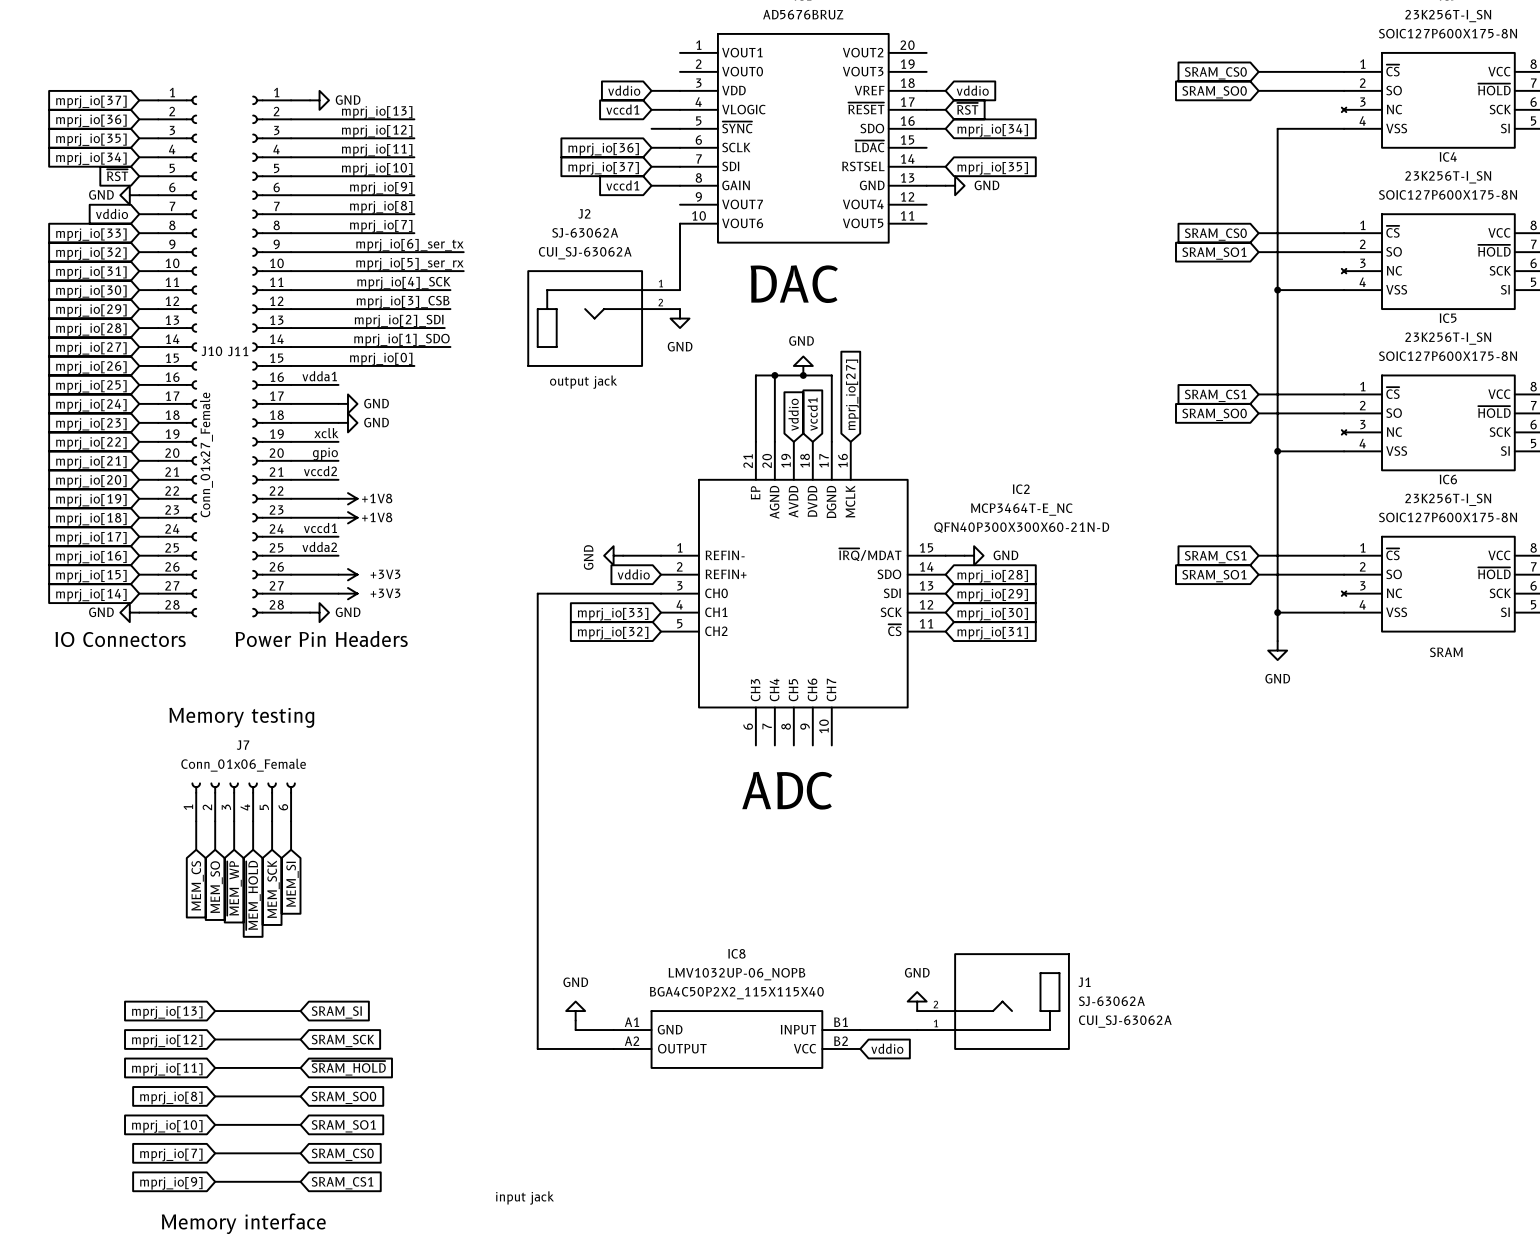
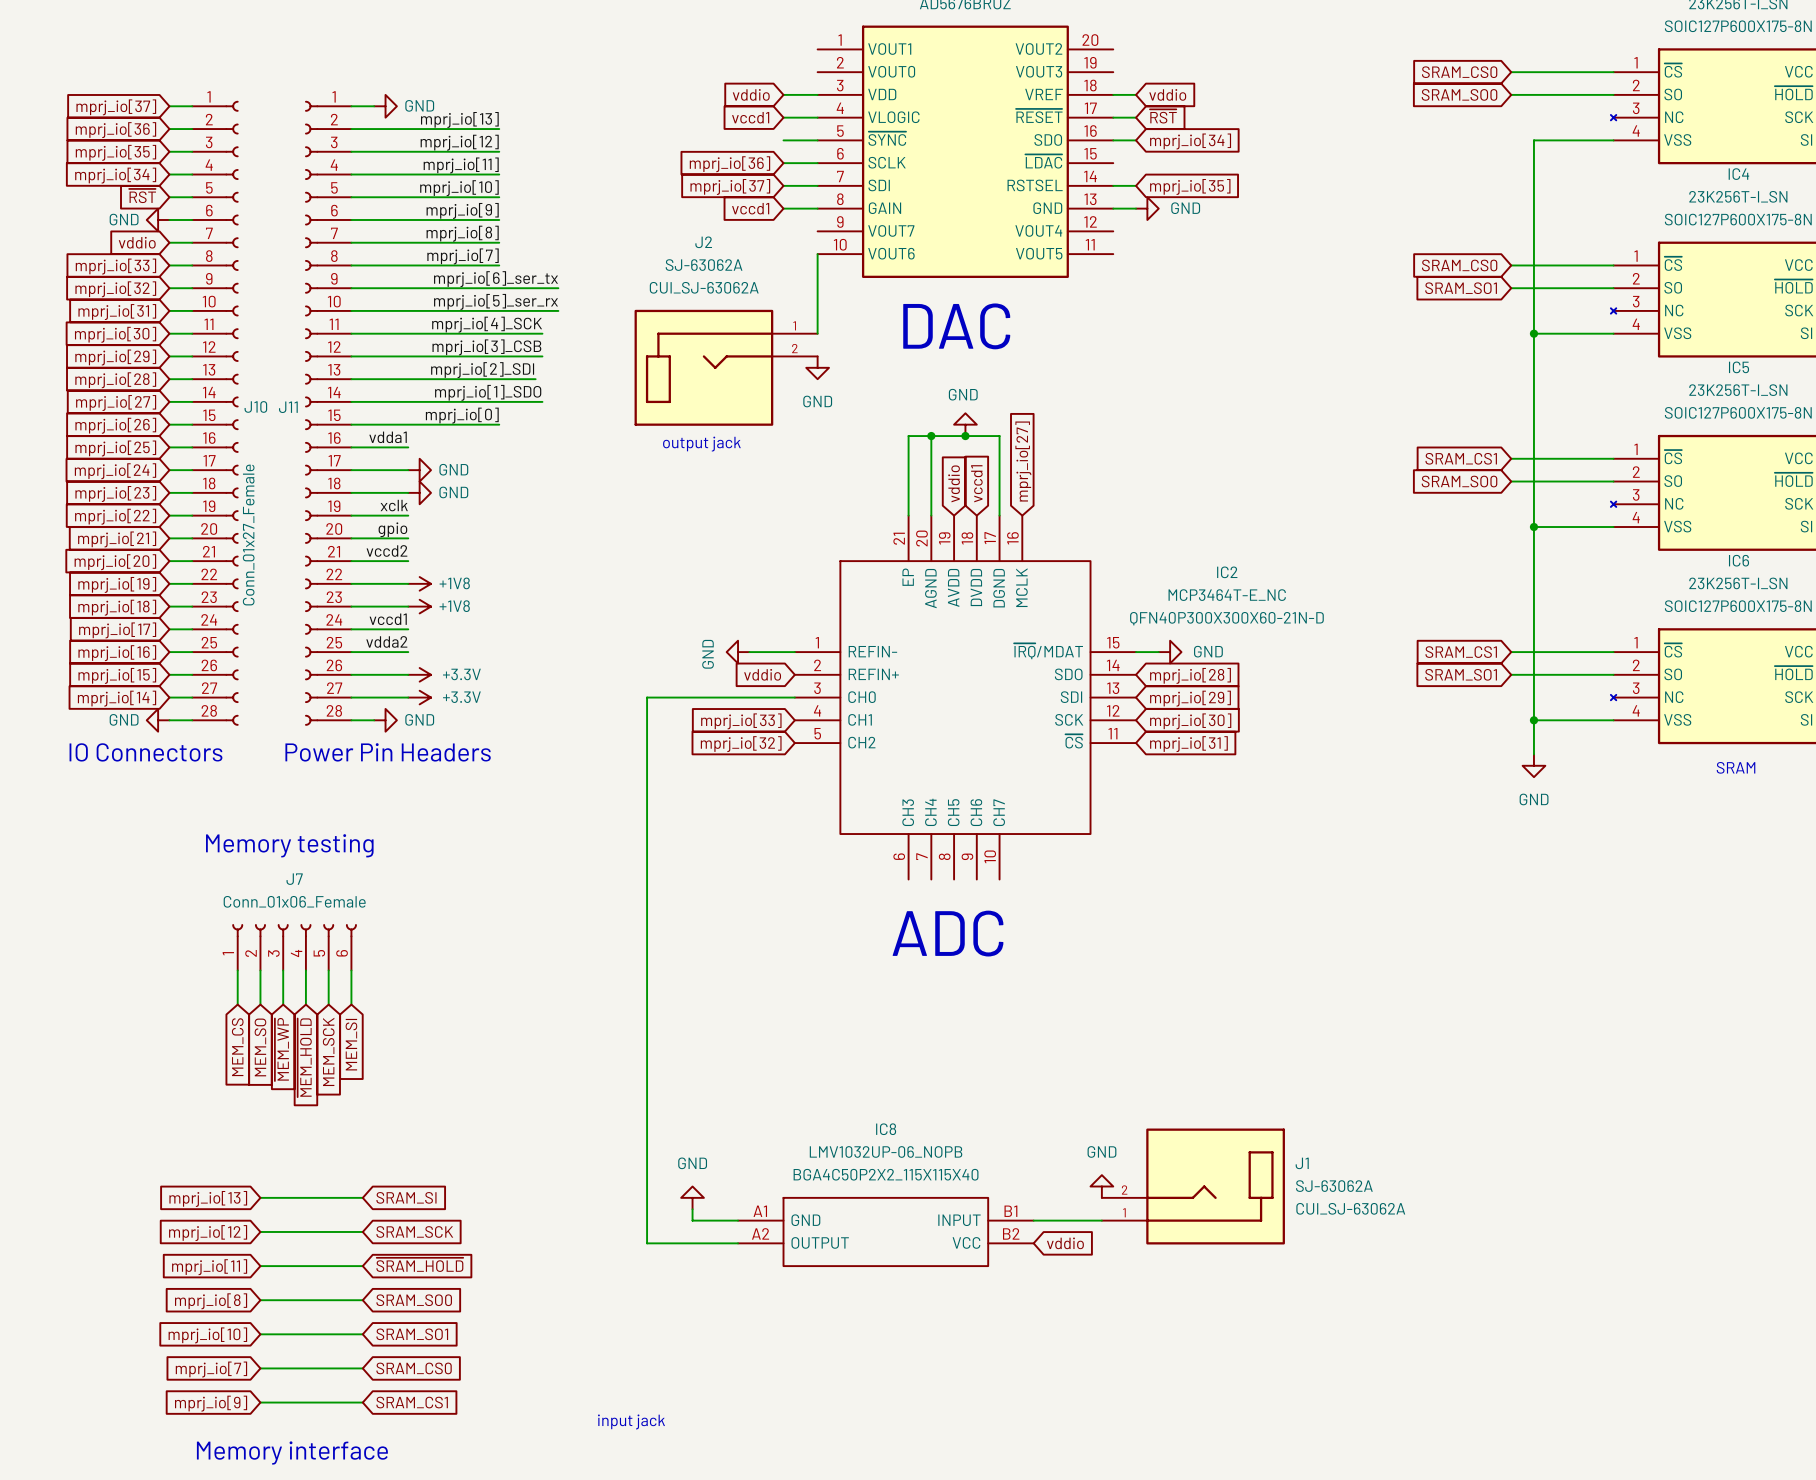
power symbol: +3V3 (347, 574) -> +3.3V (419, 674)
power symbol: +3V3 (347, 593) -> +3.3V (419, 697)

